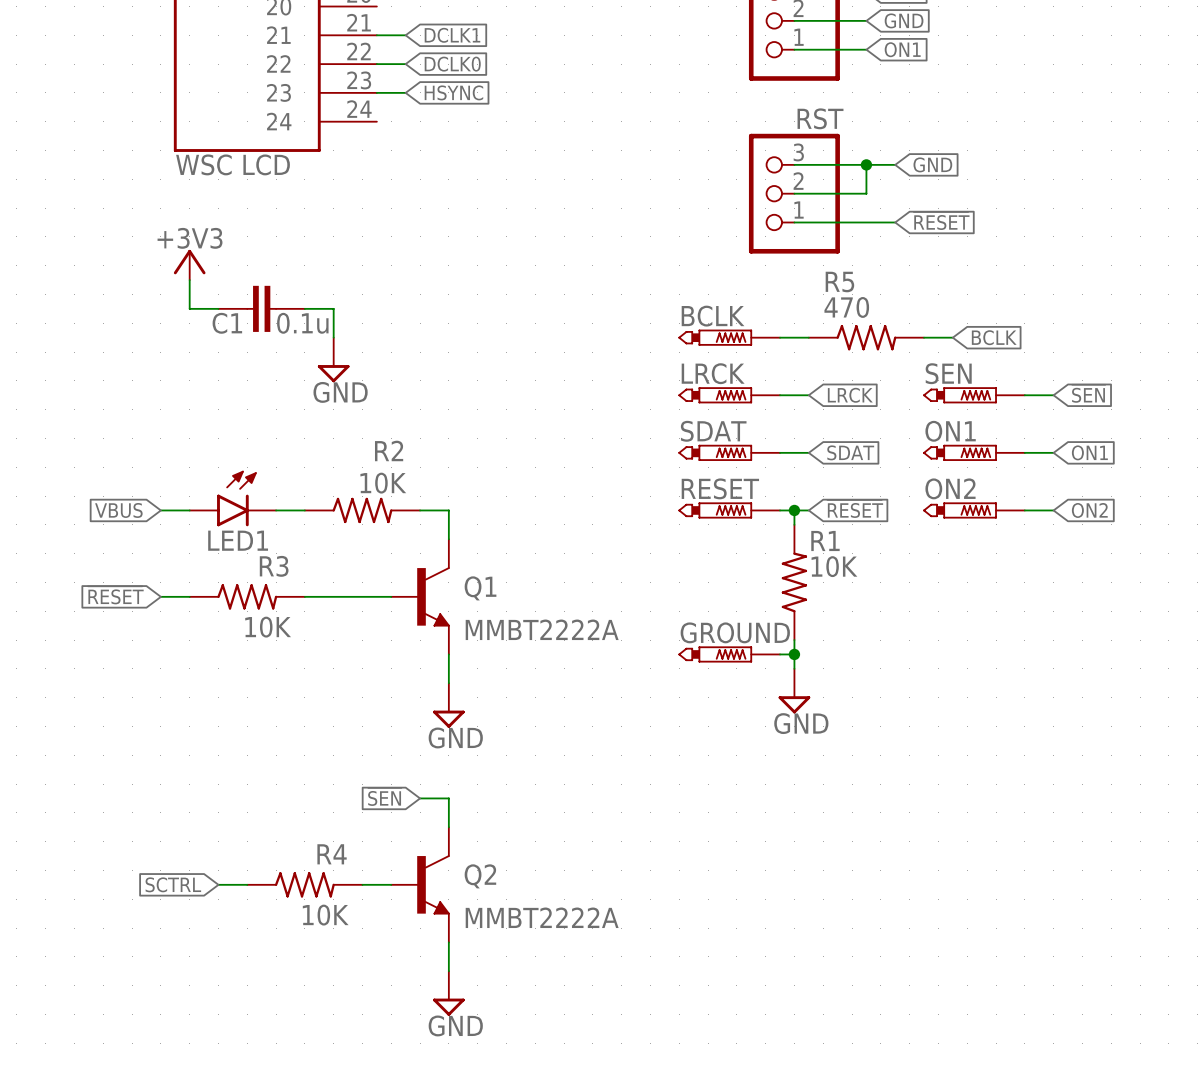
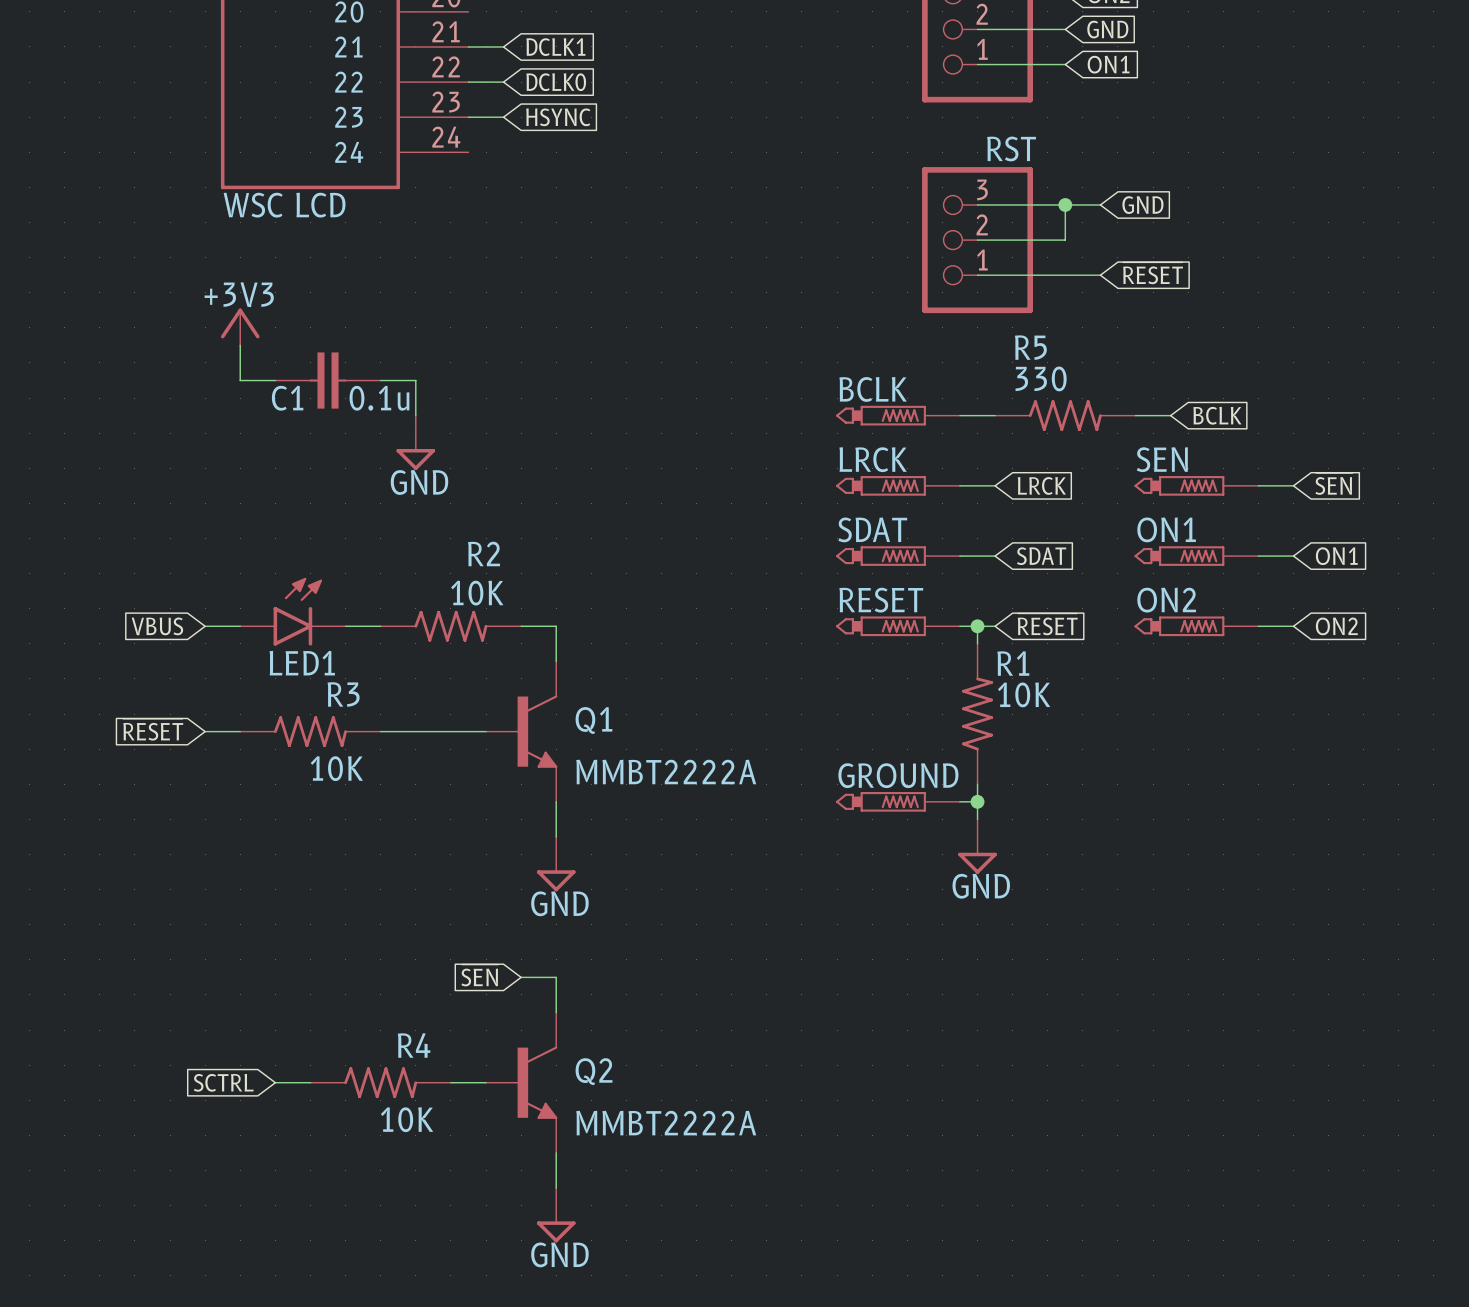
R5 value: 470 (846, 307) -> 330 (1041, 378)

